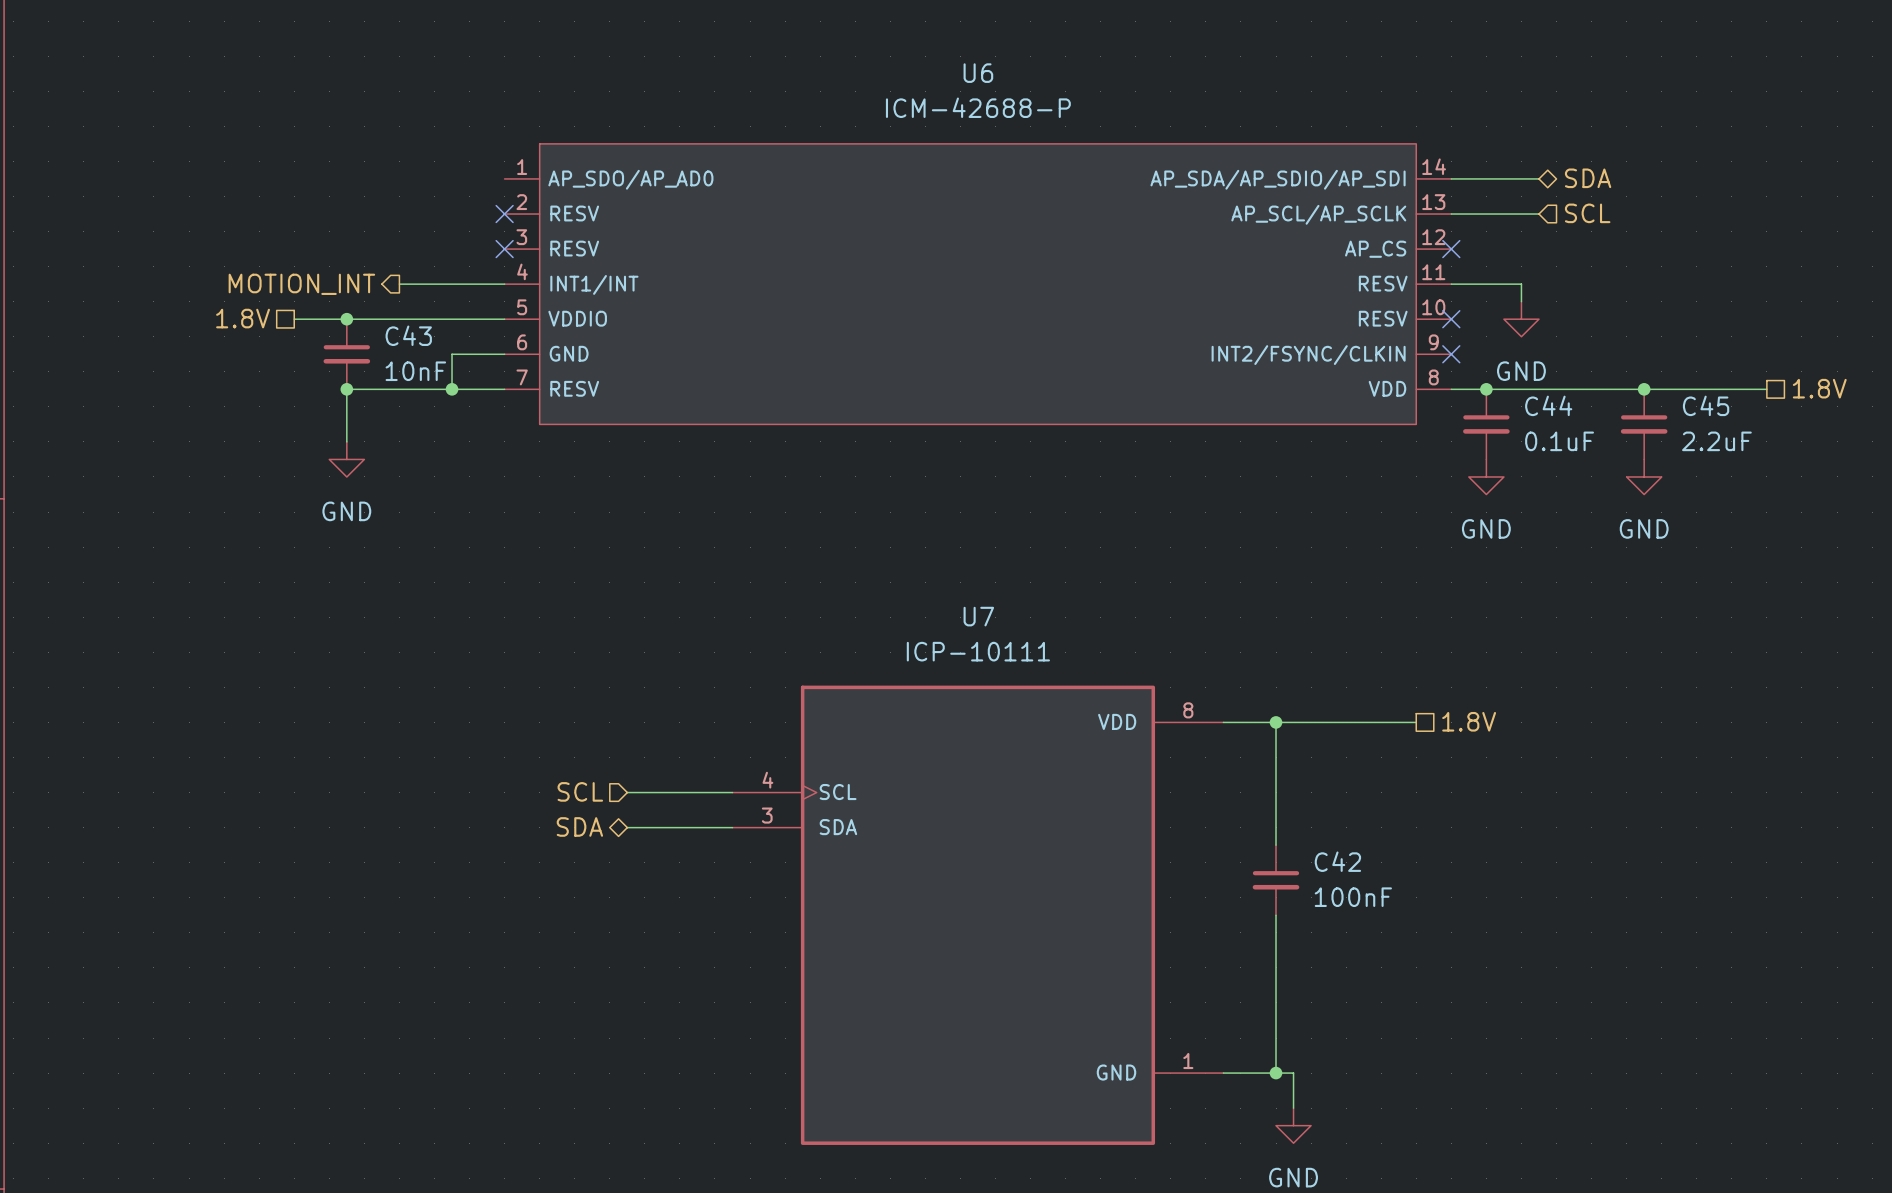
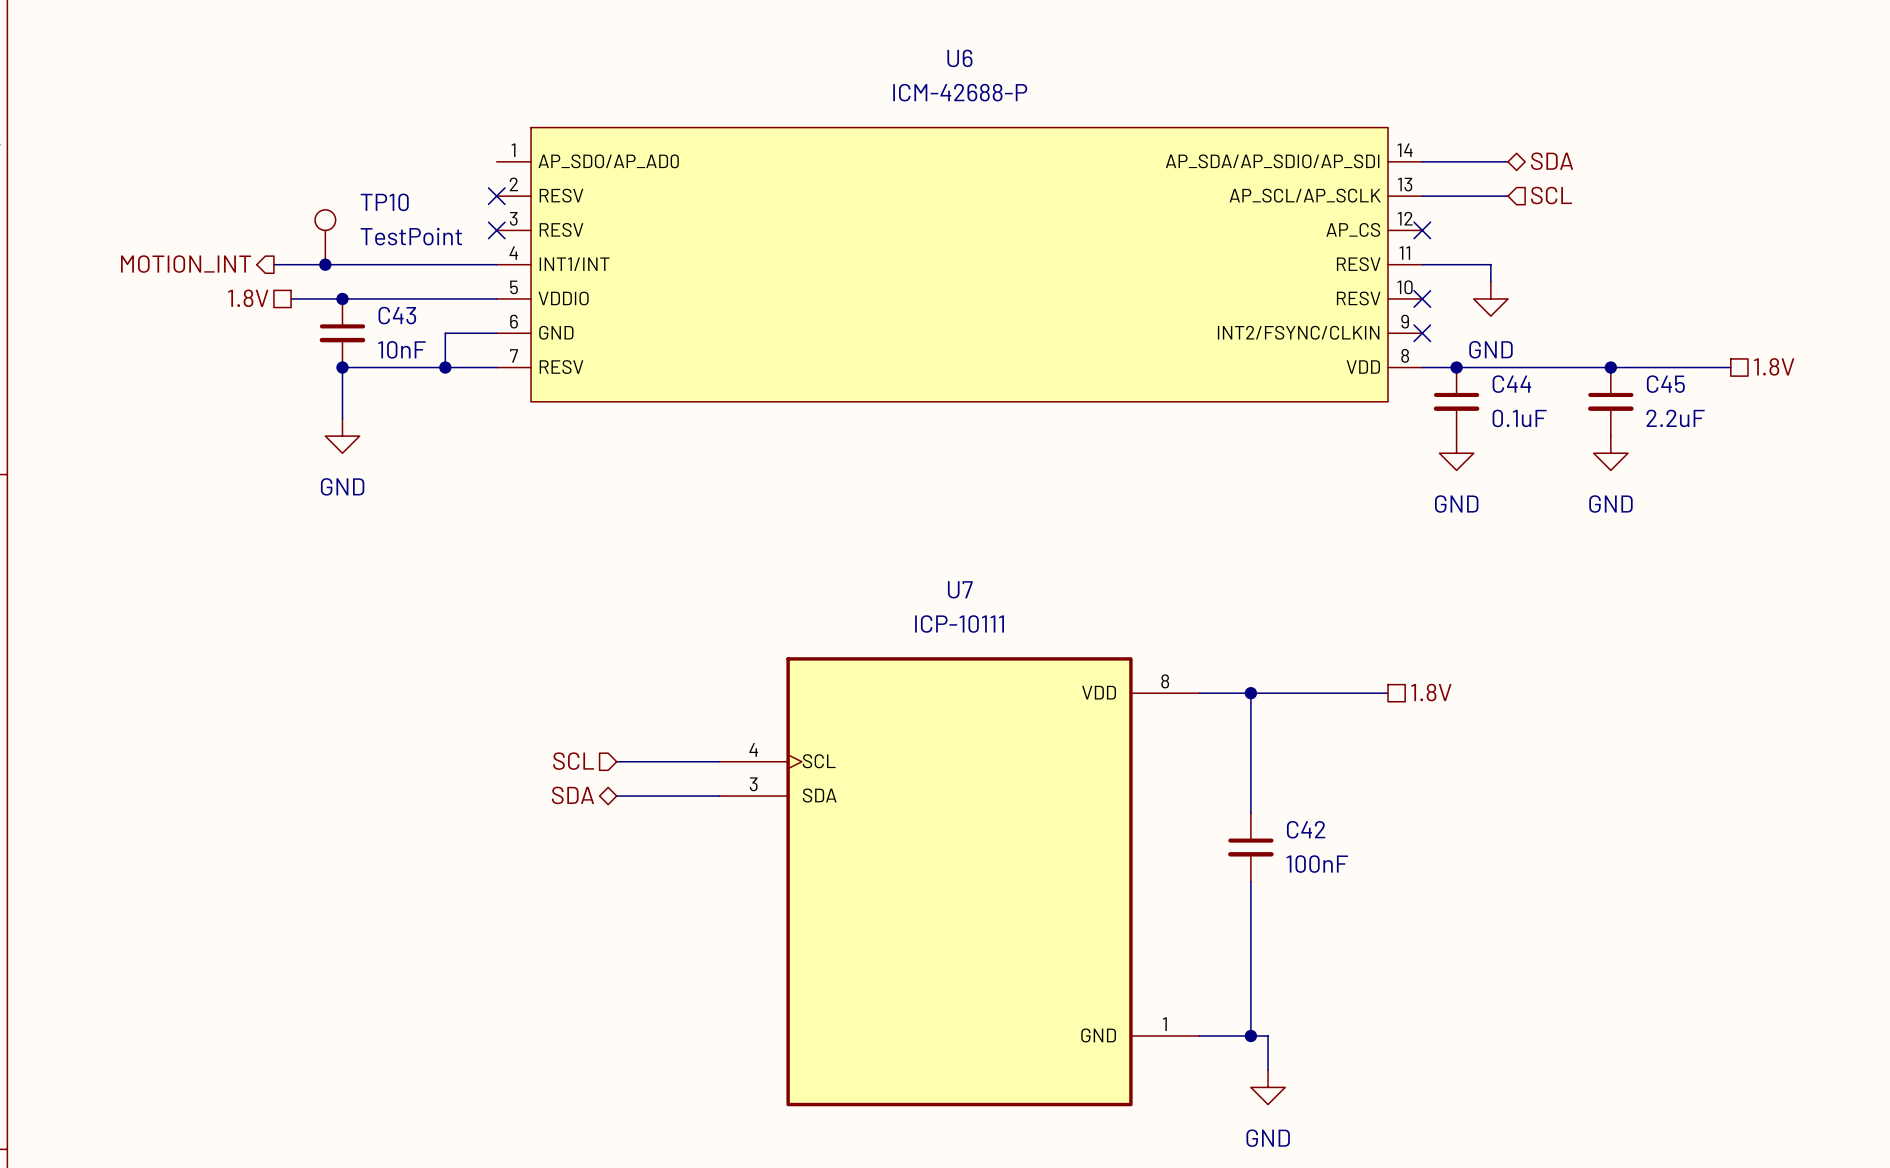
TP10: none -> TestPoint (325, 237)
wire: none -> (273, 264) (393, 264)
hierarchical label position: MOTION_INT (301, 284) -> MOTION_INT (186, 264)
junction: none -> (325, 264)

